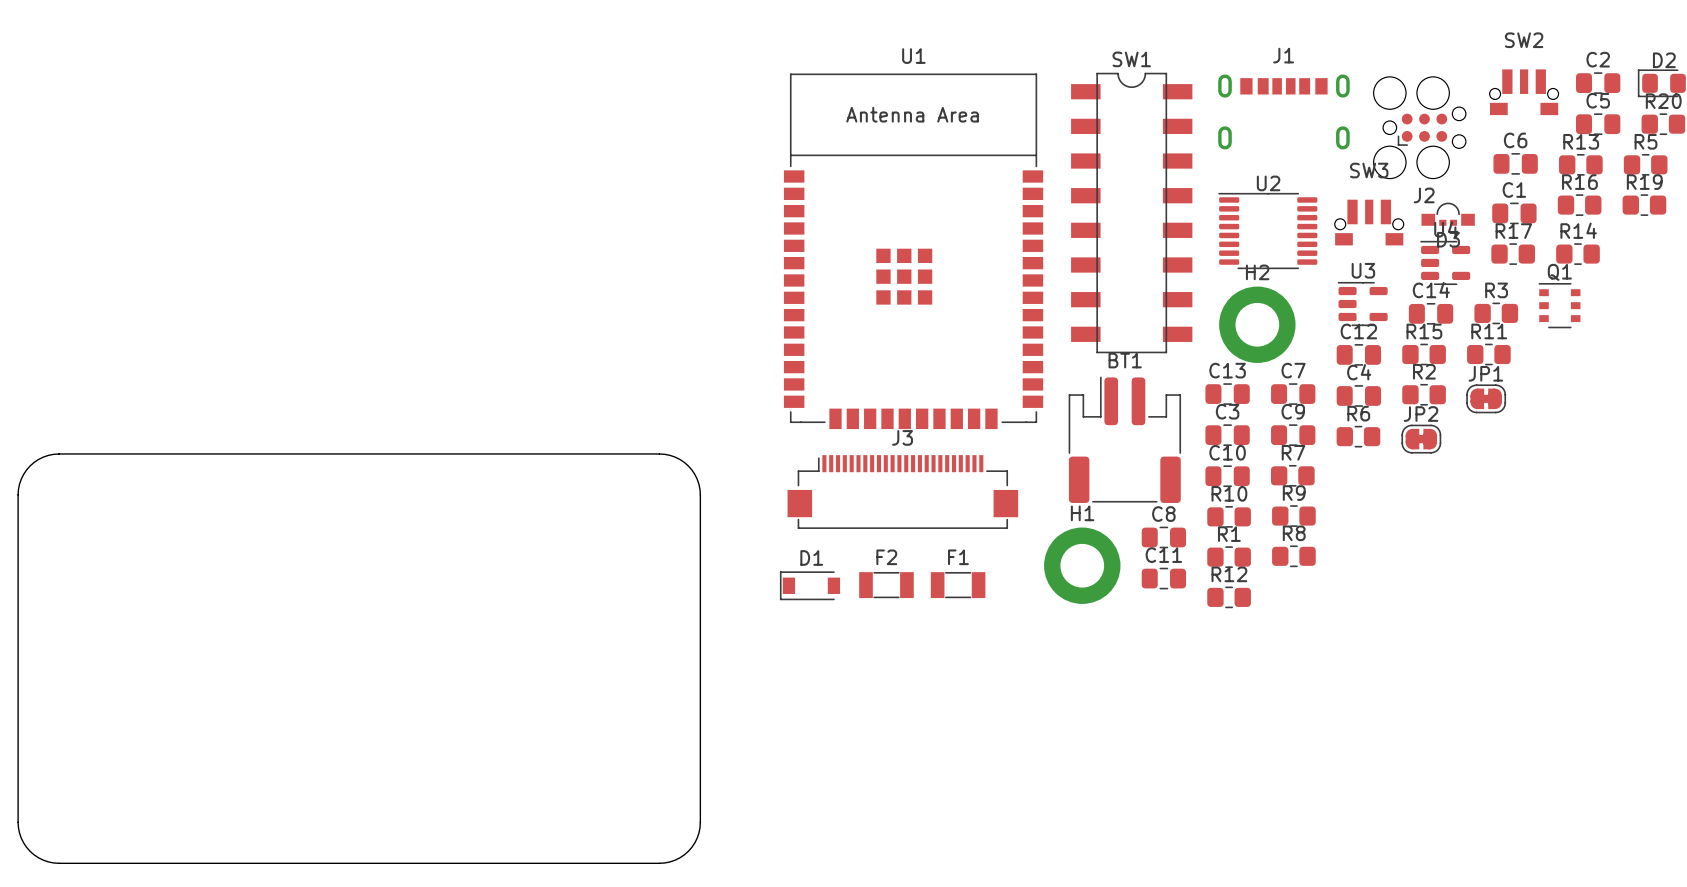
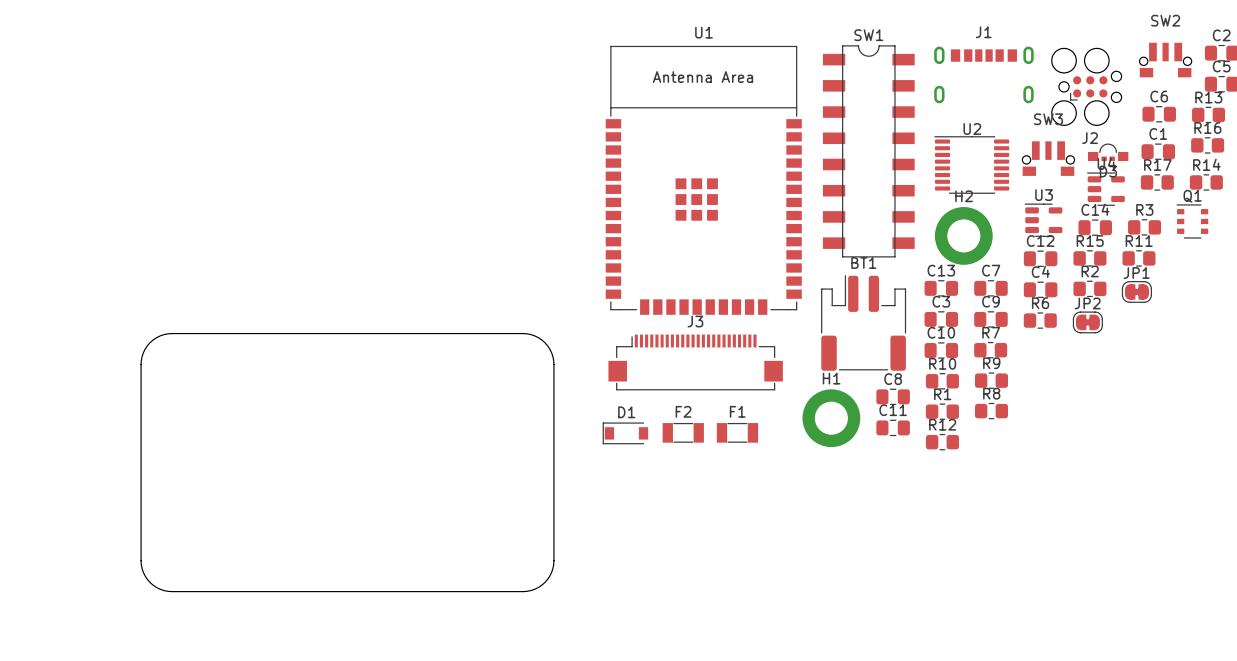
board edge: (59, 453) (659, 453) (679, 459) (694, 474) (700, 494) (700, 822) (694, 842) (679, 857) (659, 863) (59, 863) (38, 857) (23, 842) (18, 822) (18, 494) (21, 479) (30, 465) (43, 457) (59, 453) -> (172, 333) (160, 335) (150, 342) (143, 352) (141, 364) (141, 564) (147, 579) (156, 587) (172, 591) (522, 591) (538, 587) (549, 576) (553, 560) (553, 364) (549, 349) (538, 337) (522, 333) (172, 333)

